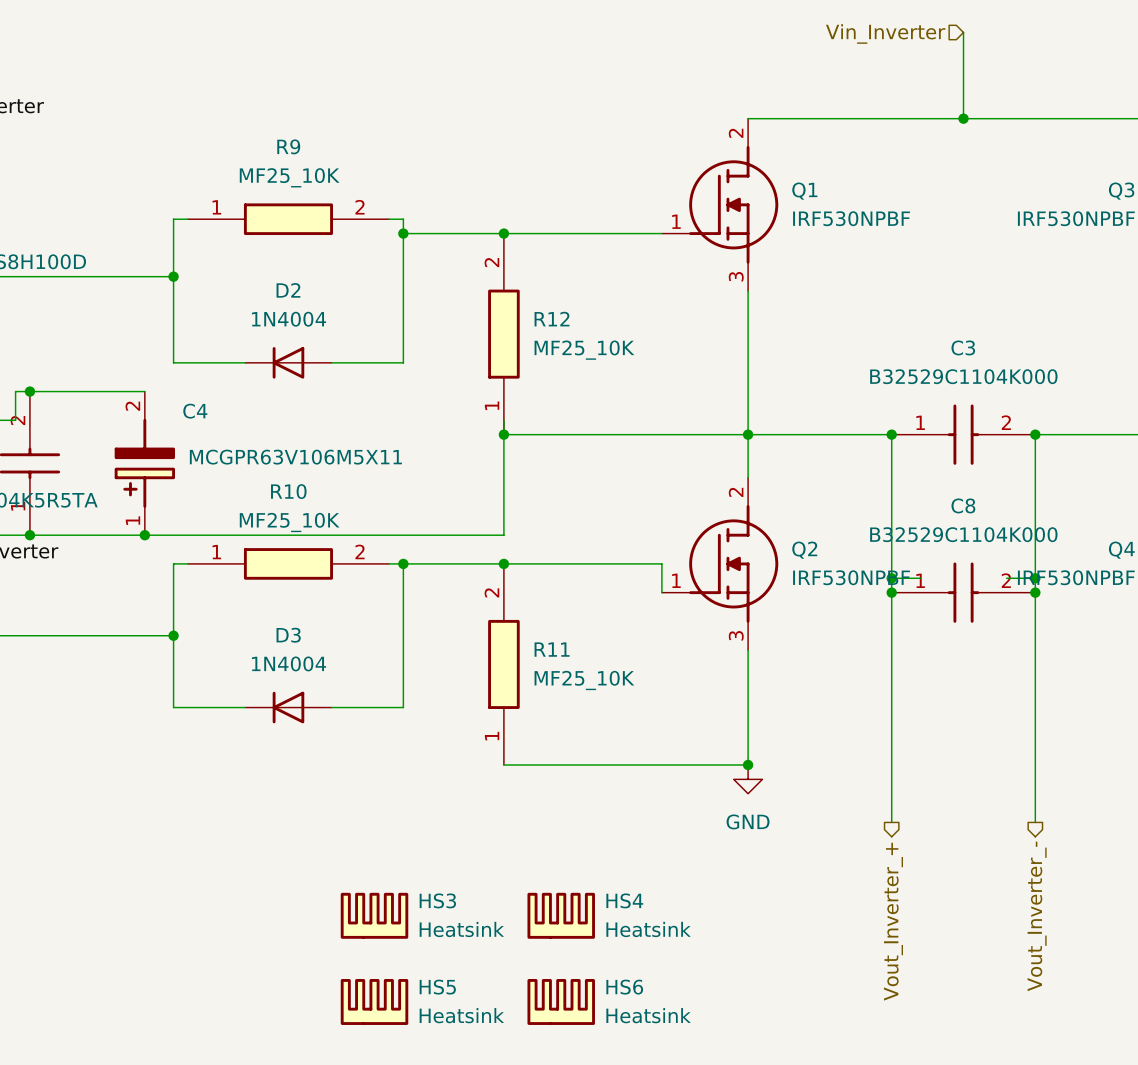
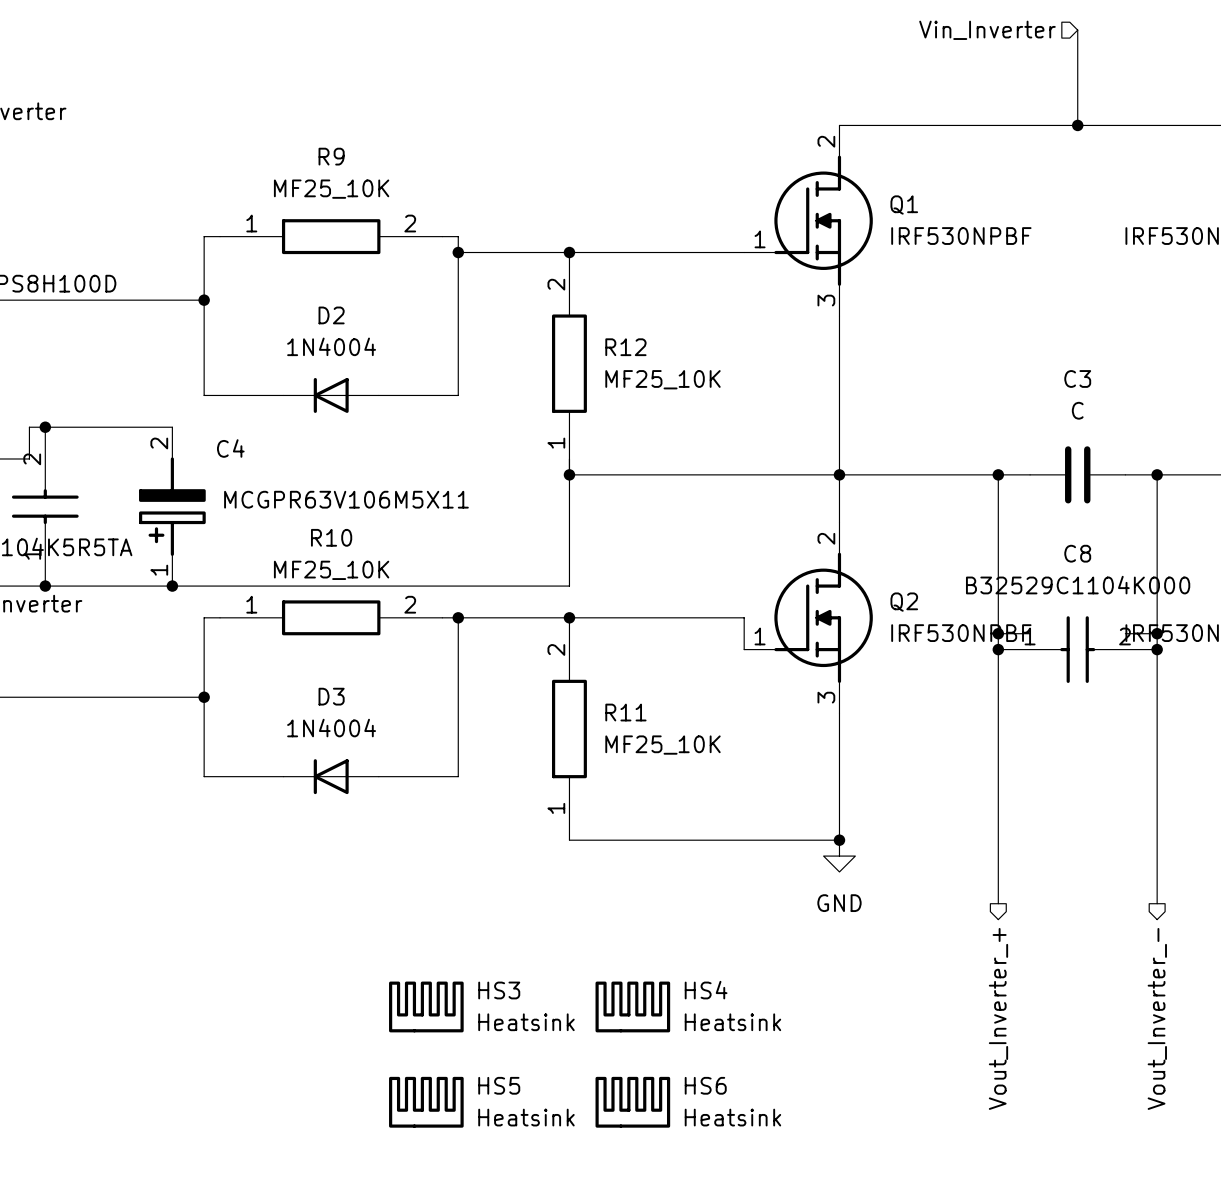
C3 value: B32529C1104K000 (963, 376) -> C (1077, 410)
C3 symbol: [891, 404, 1036, 465] -> [1030, 446, 1126, 504]

